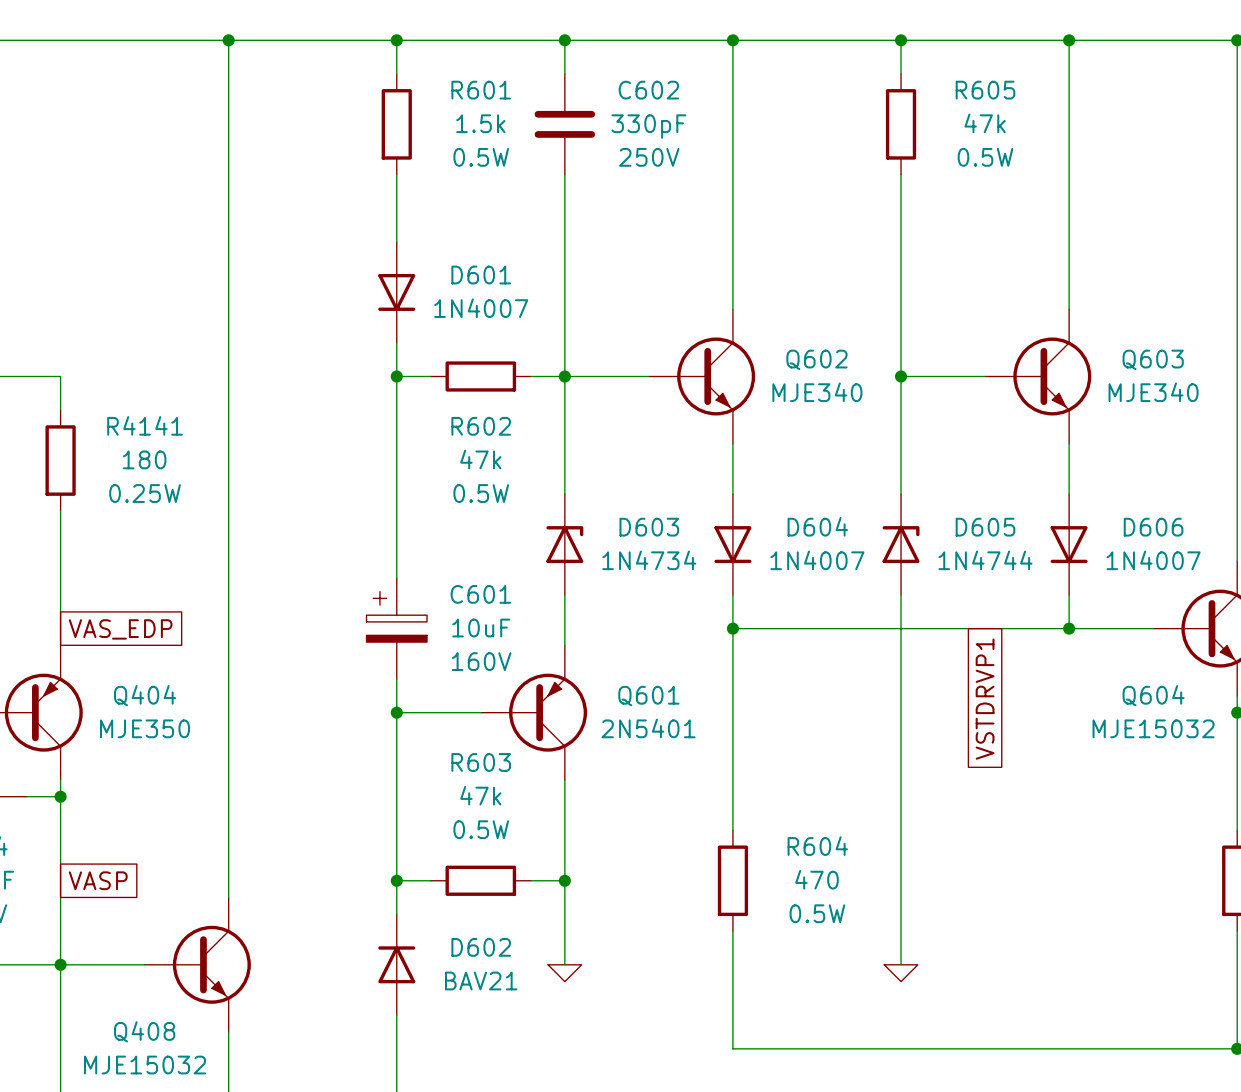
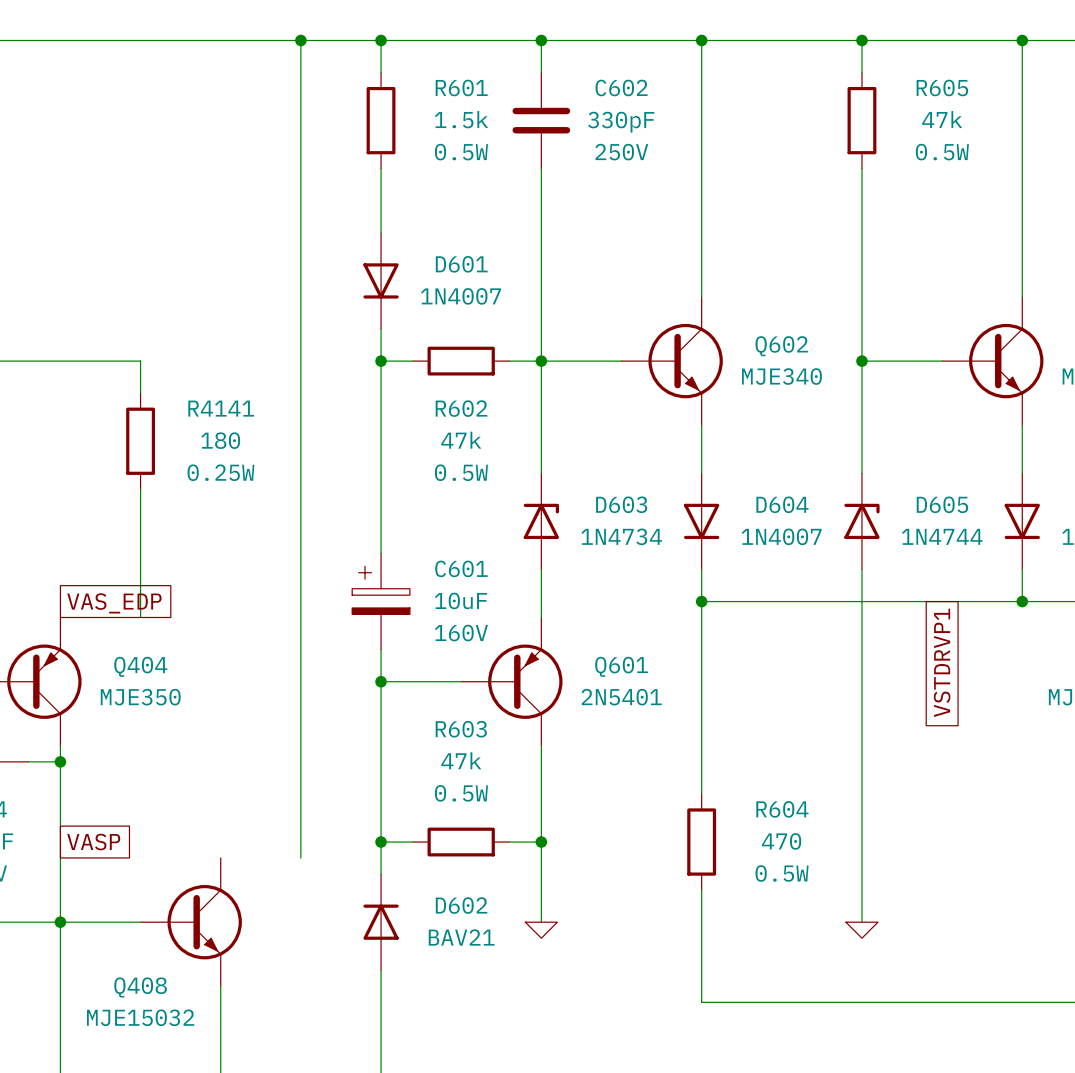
wire: (228, 40) (228, 897) -> (300, 40) (300, 858)
junction: (228, 40) -> none
junction: none -> (300, 40)
wire: (60, 376) (60, 410) -> (60, 361) (140, 361) (140, 393)
R4141 position: (60, 460) -> (140, 441)
wire: (60, 510) (60, 645) -> (140, 489) (140, 617)

